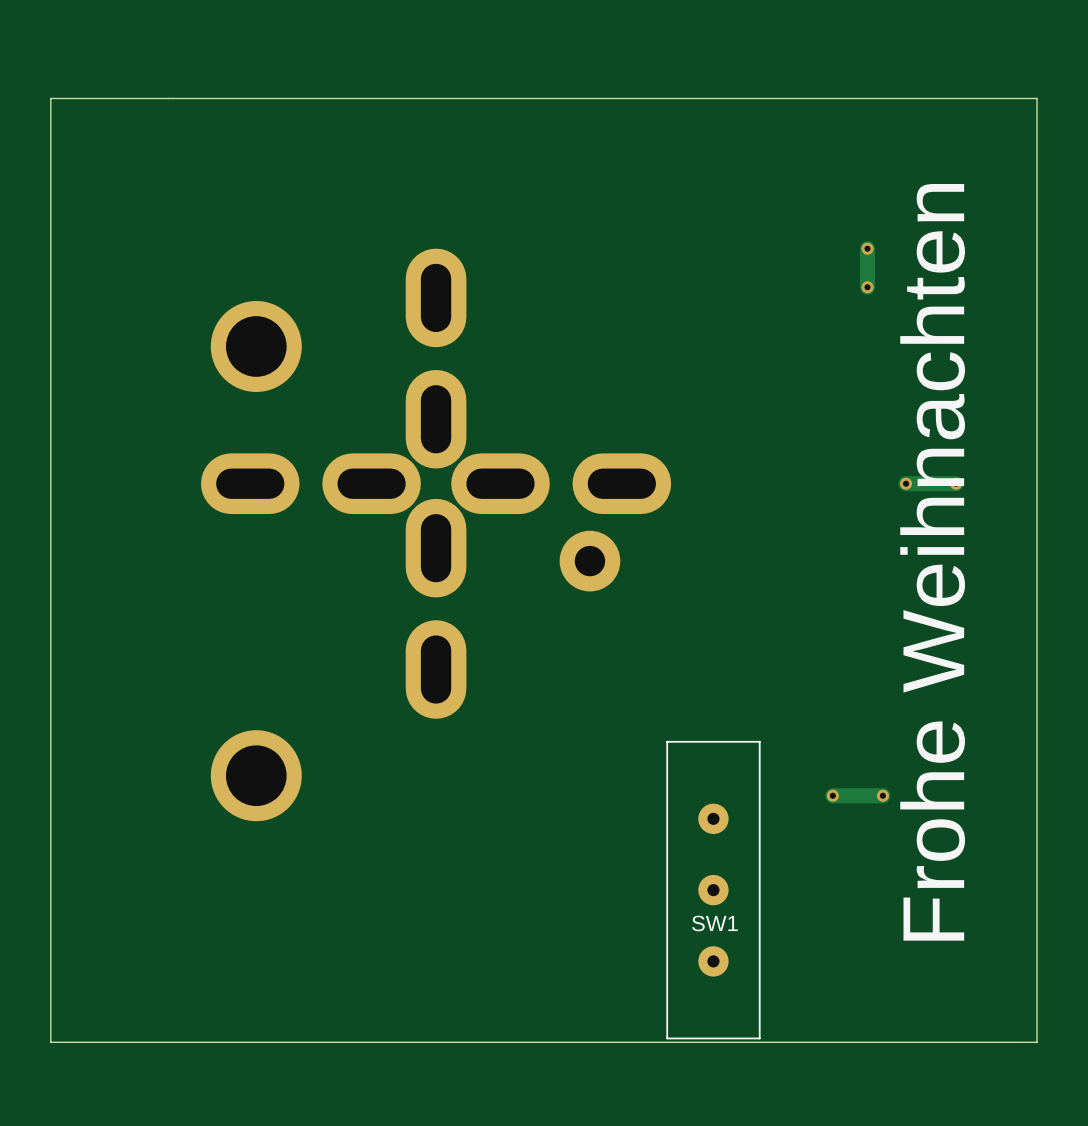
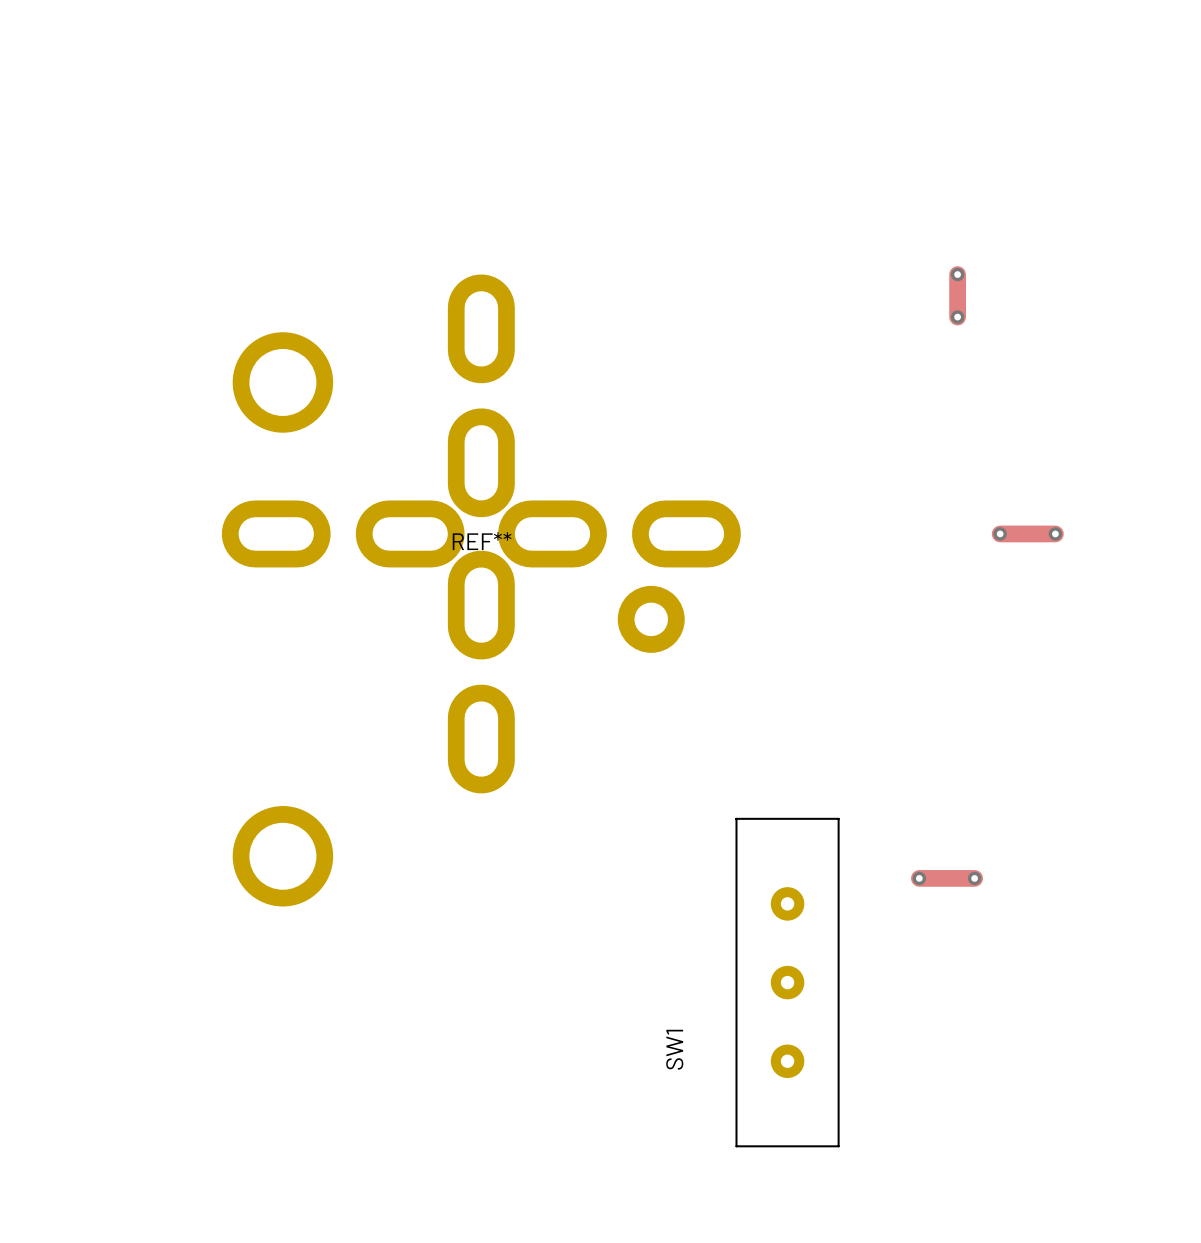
board edge: (50, 98) (1037, 98) (1037, 1042) (50, 1042) (50, 98) -> none
REF** name: none -> REF** (482, 541)
text: Frohe Weihnachten (932, 562) -> none
SW1 name rotation: 0° (714, 923) -> 90° counterclockwise (674, 1049)
SW1 name position: SW1 (714, 923) -> SW1 (674, 1049)

